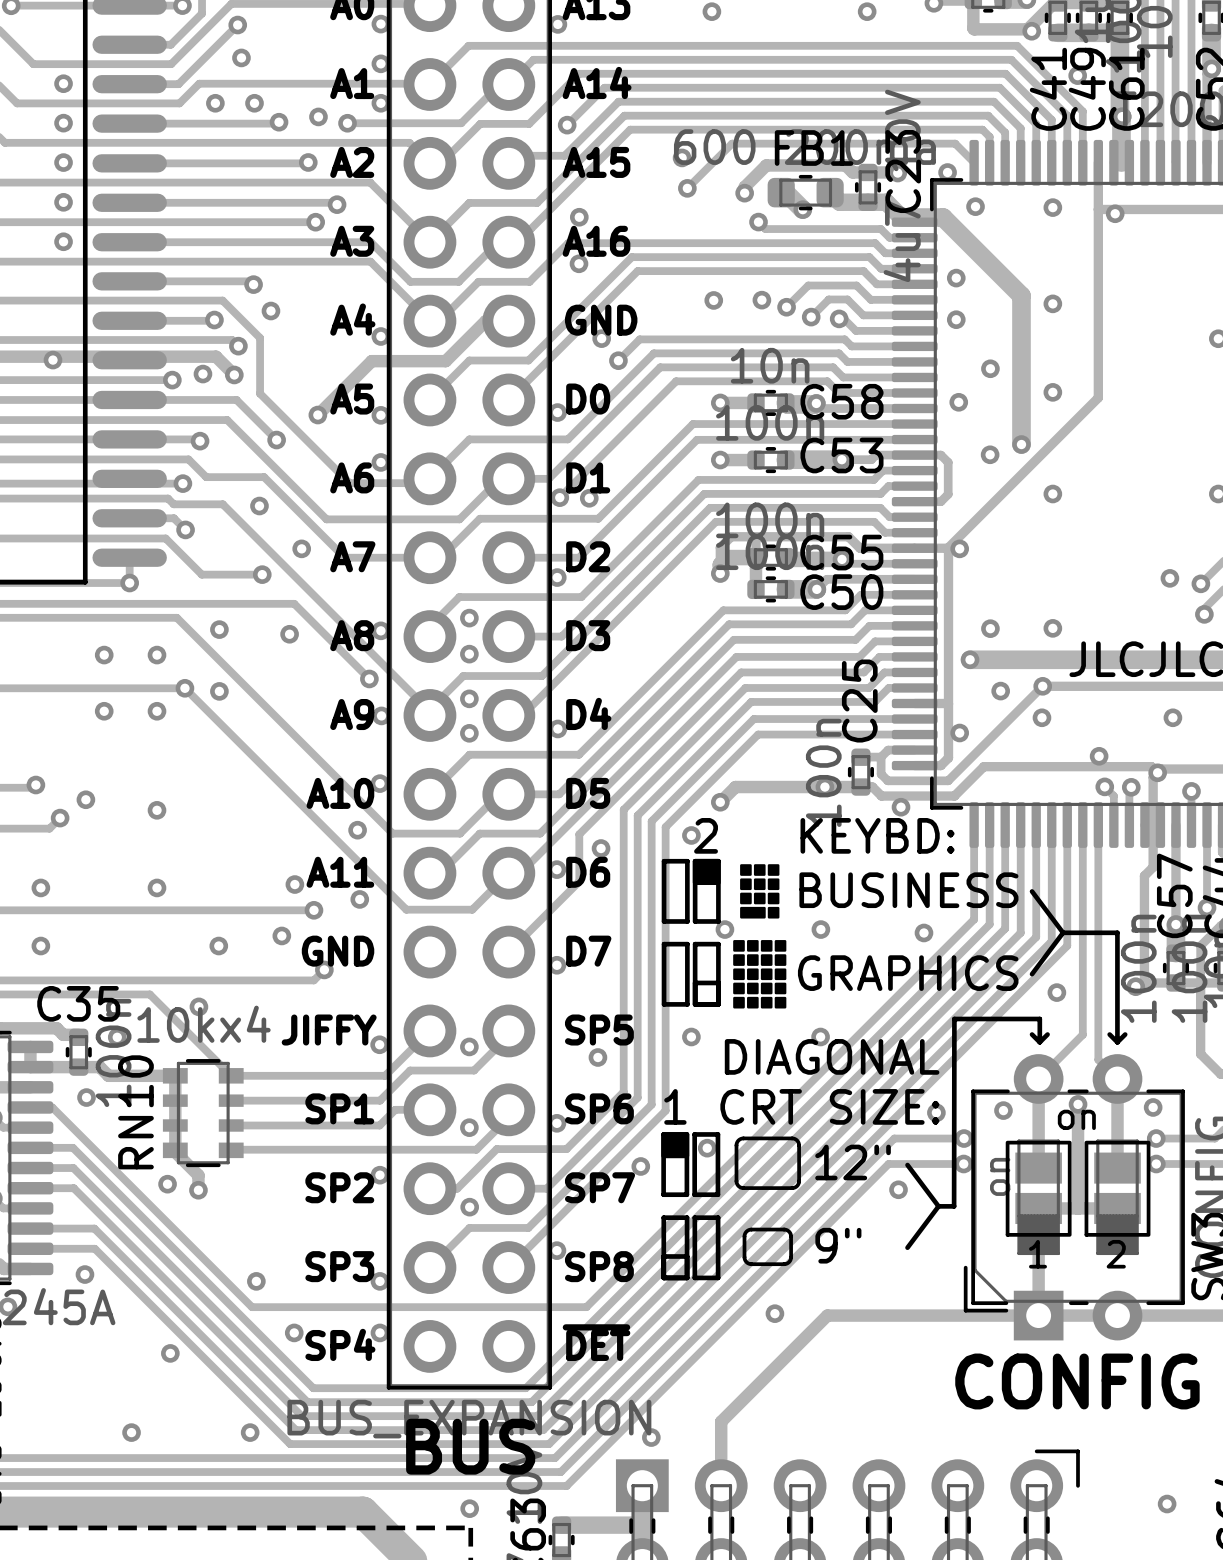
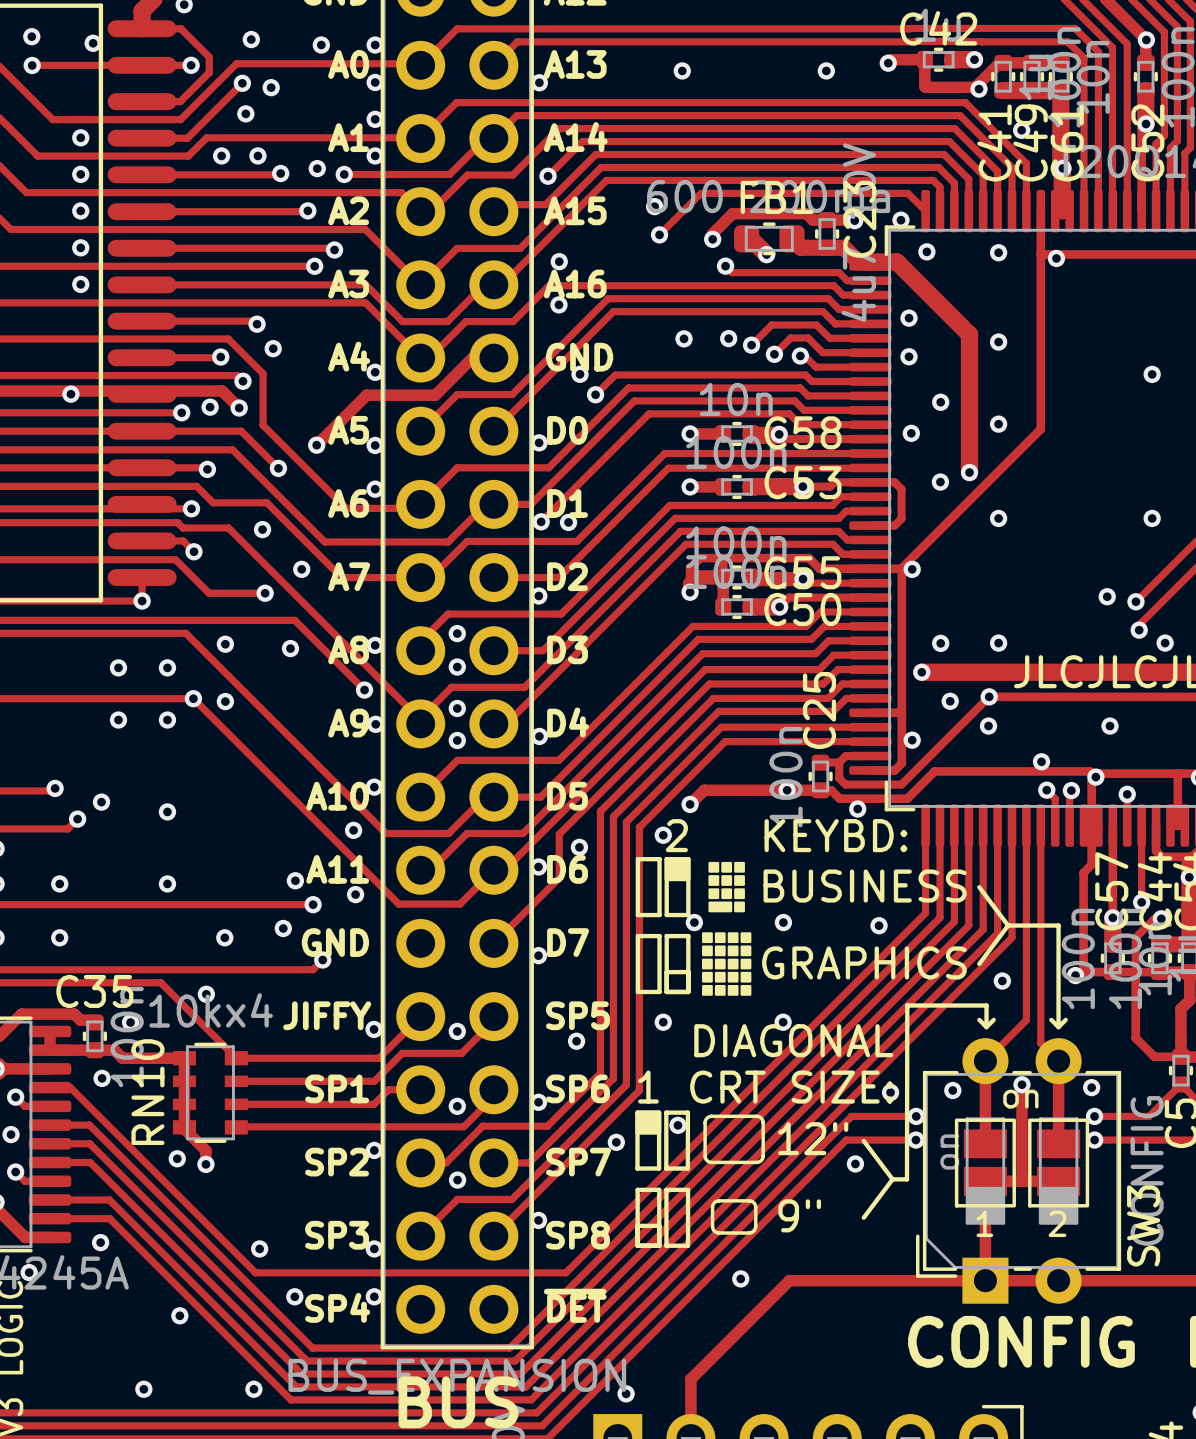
via: none -> (271, 87)

